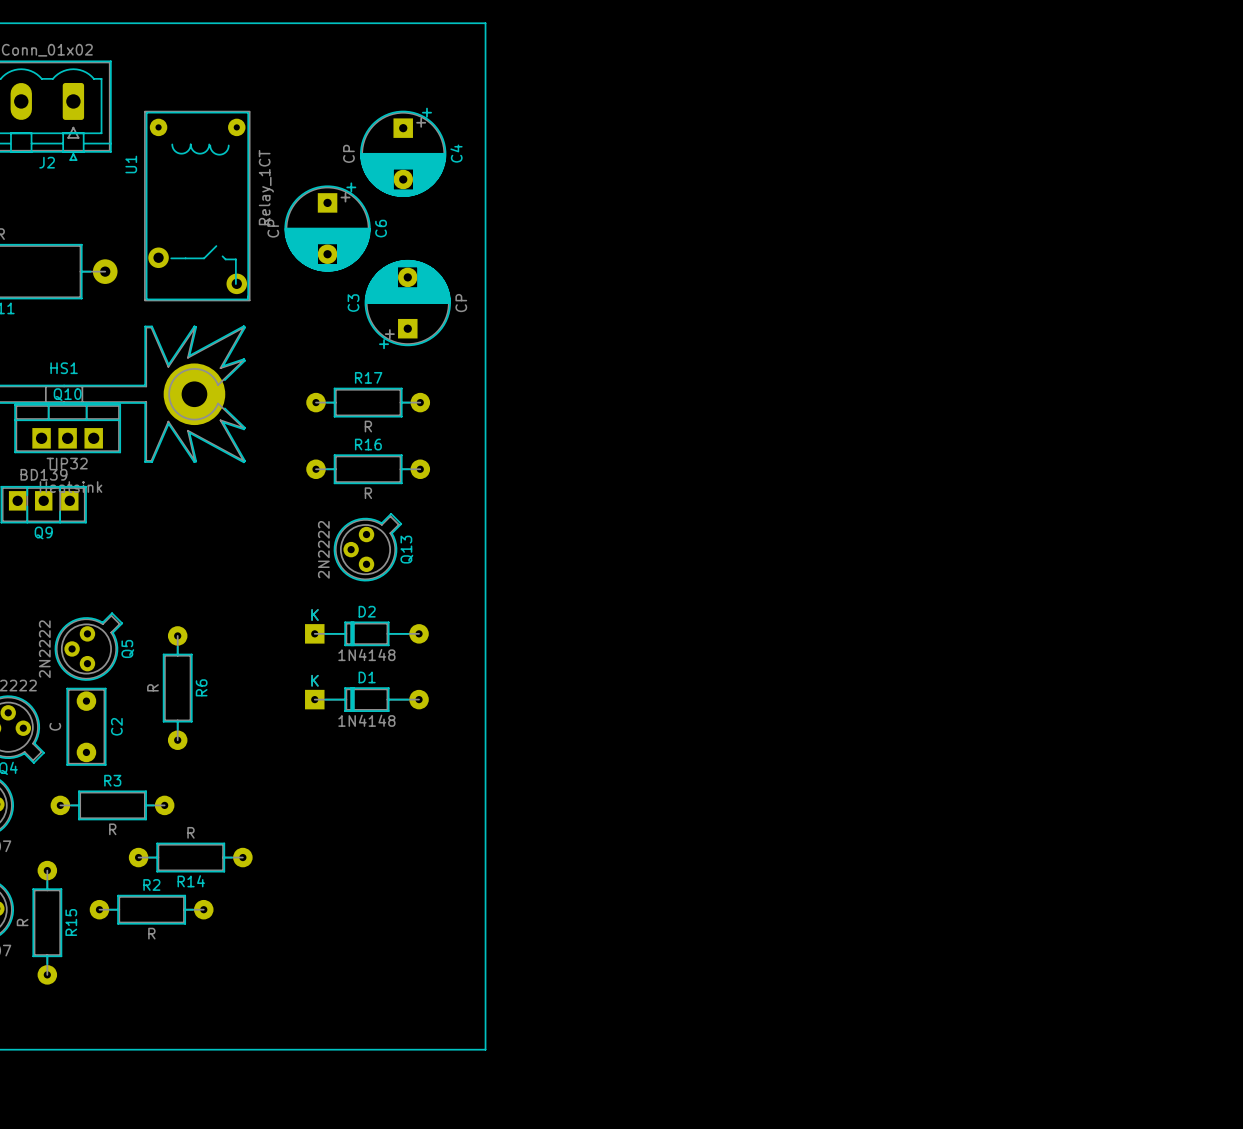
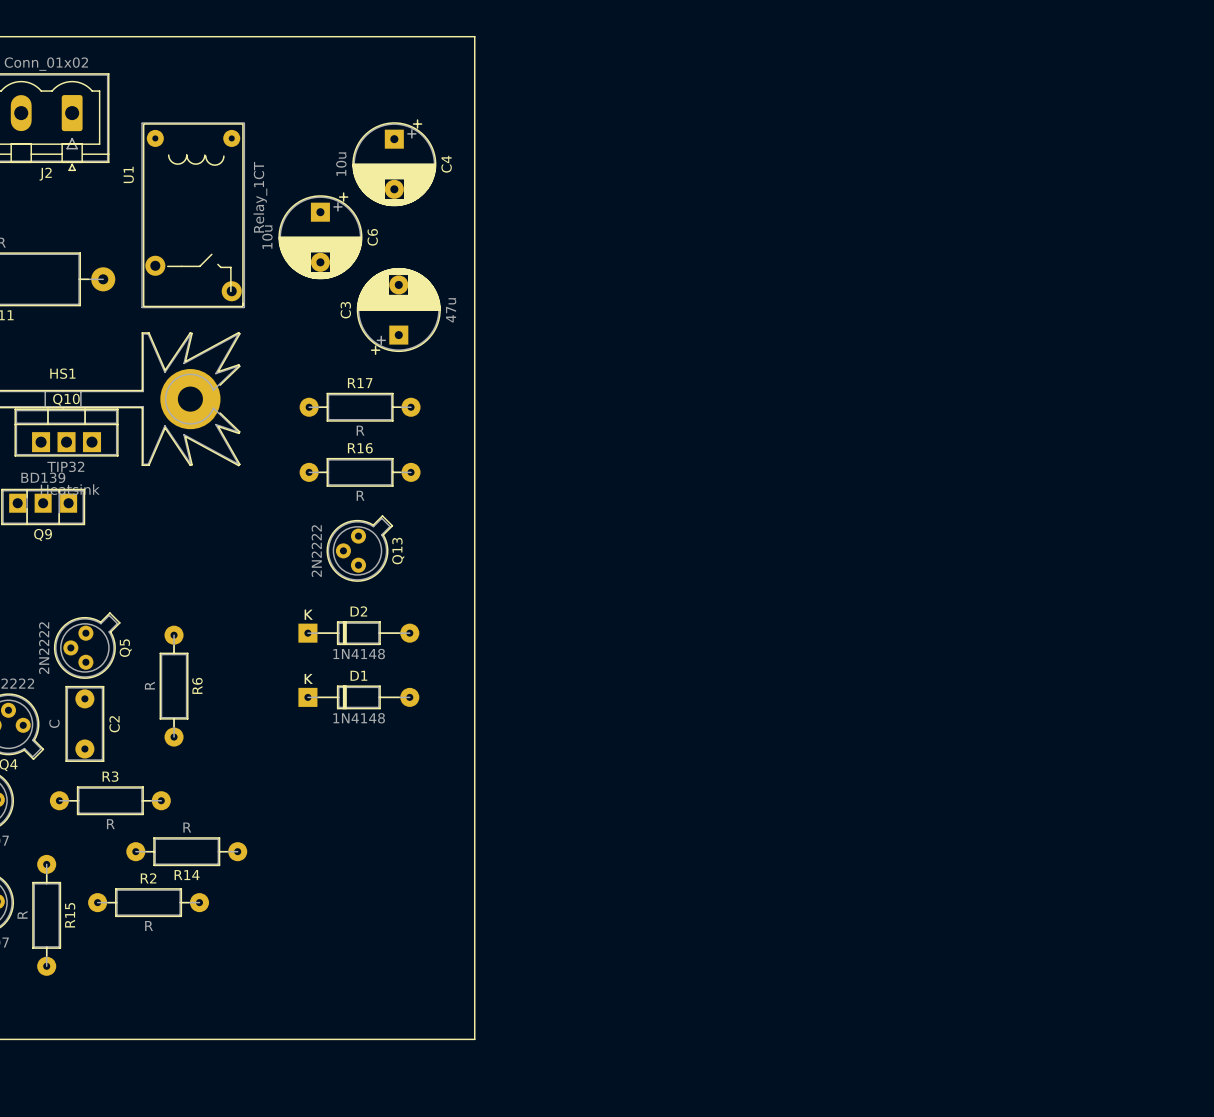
C4 value: CP (348, 153) -> 10u (341, 164)
C6 value: CP (273, 228) -> 10u (267, 237)
C3 value: CP (461, 303) -> 47u (451, 310)

